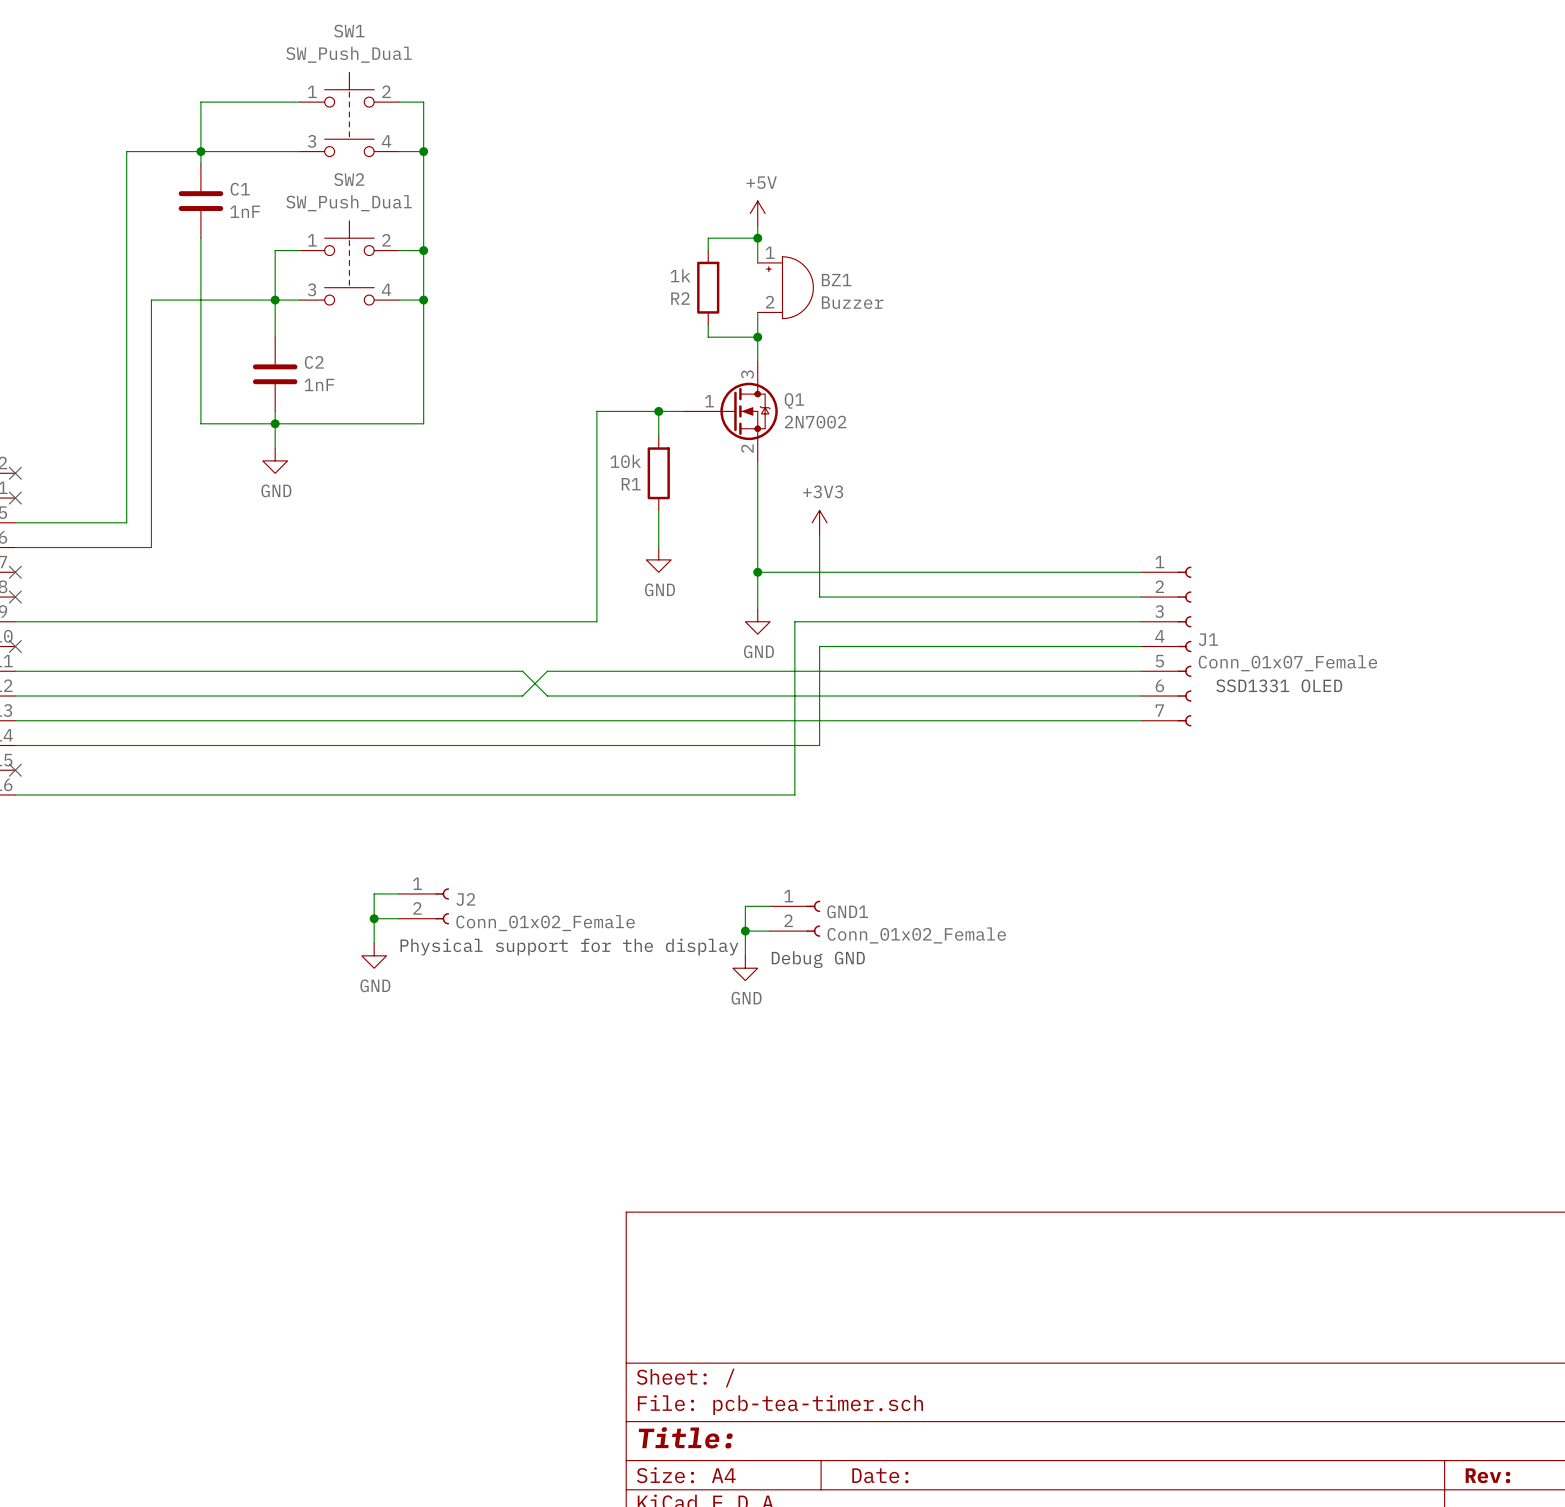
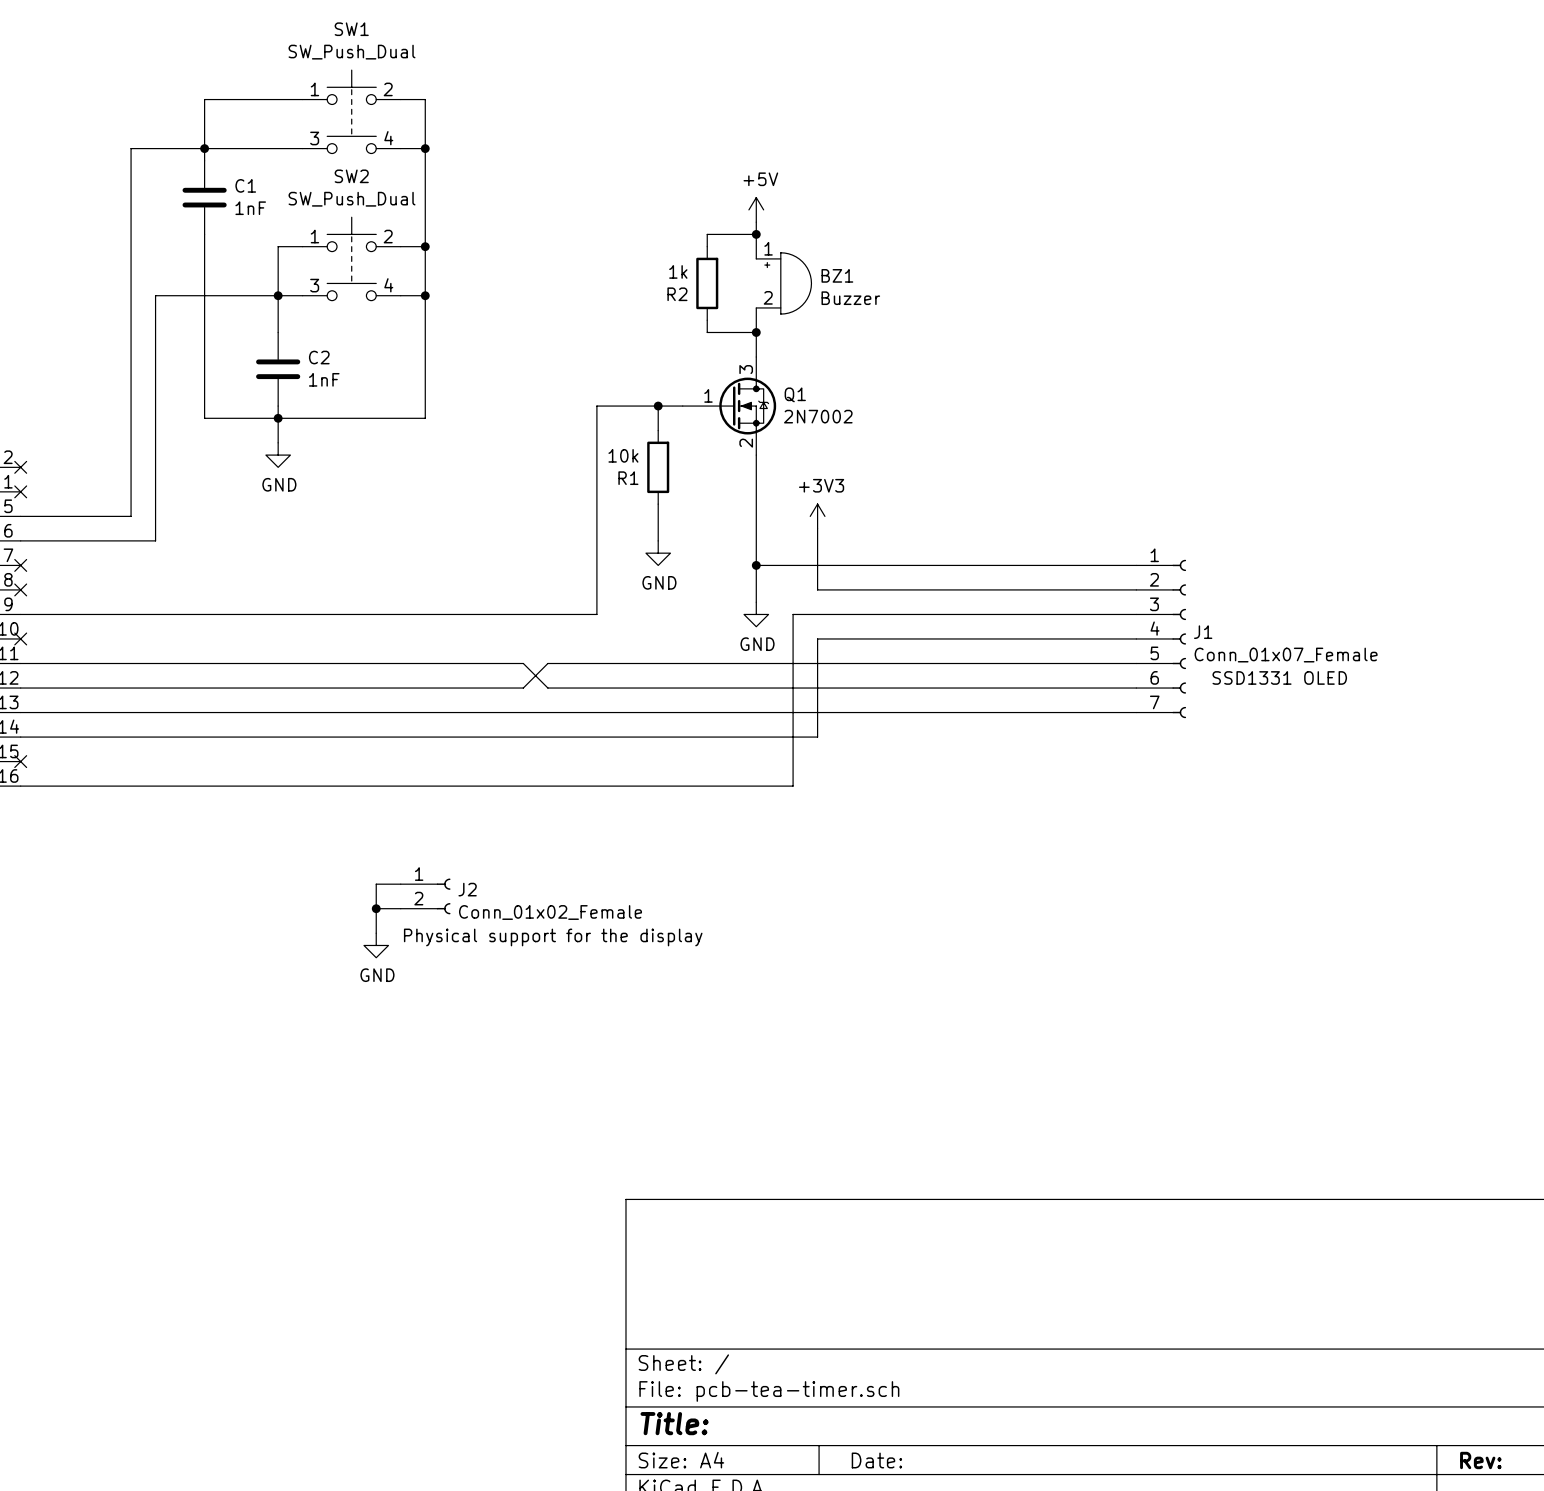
wire: (770, 906) (745, 906) (745, 955) -> none
GND1: Conn_01x02_Female (795, 918) -> none
wire: (745, 931) (770, 931) -> none
junction: (745, 931) -> none
text: Debug GND (818, 959) -> none
power symbol: GND (745, 968) -> none

